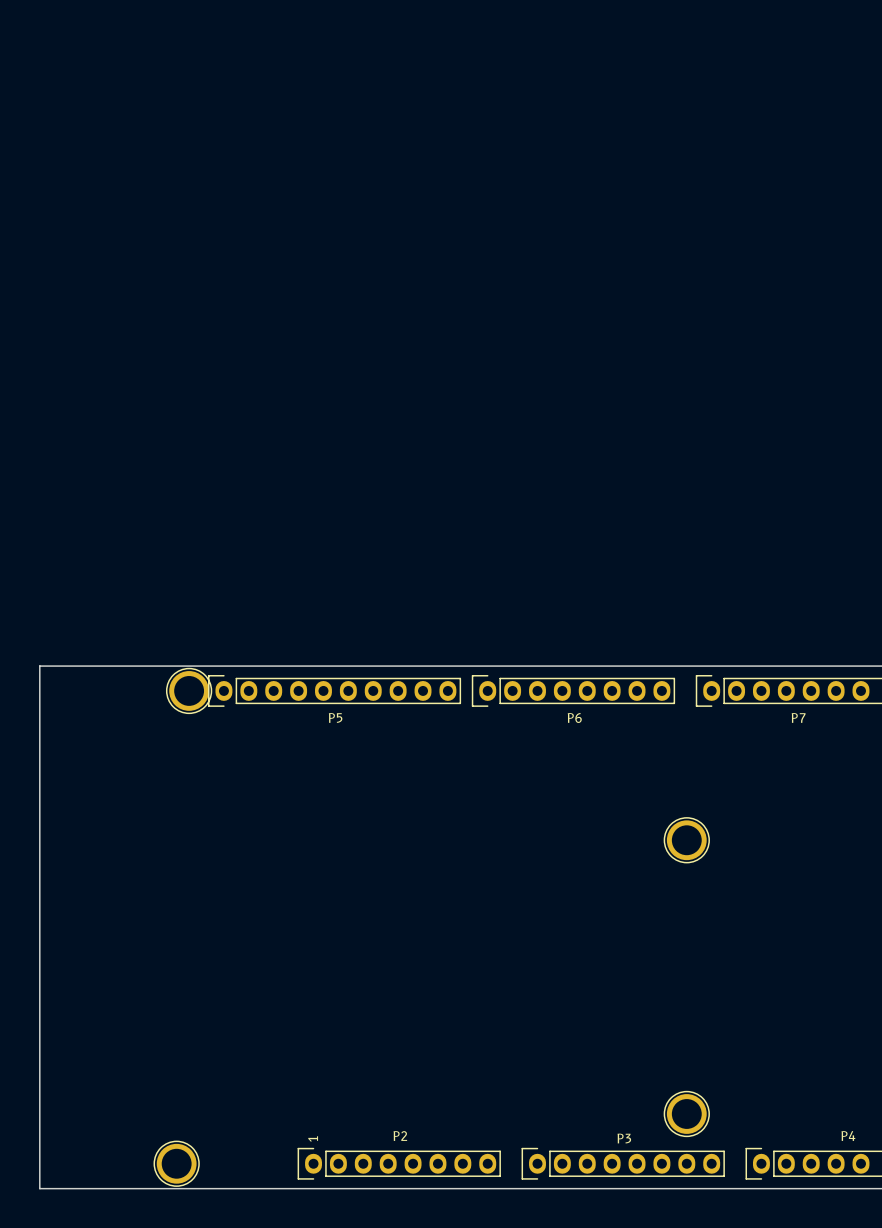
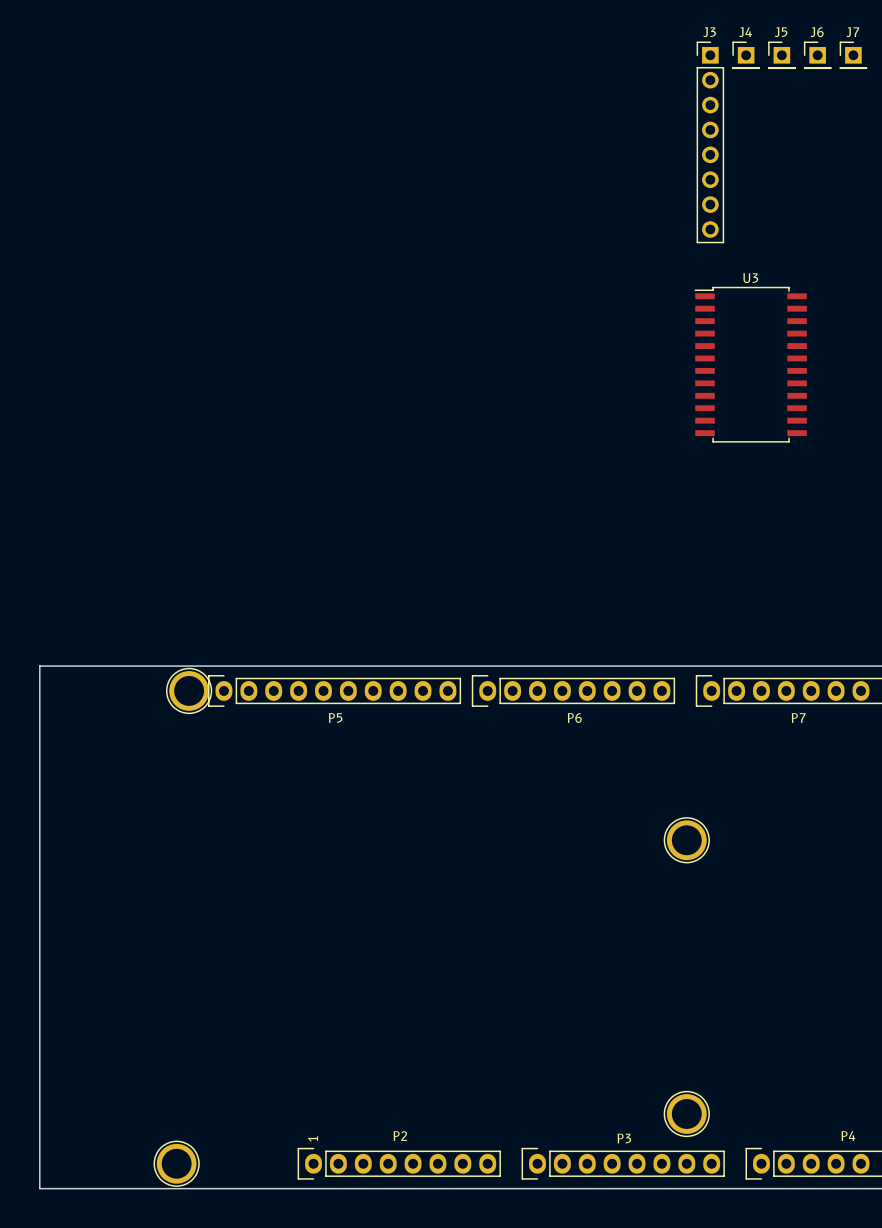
J4: none -> (746, 55)
J5: none -> (781, 55)
J6: none -> (817, 55)
J7: none -> (853, 55)
J3: none -> (710, 142)
U3: none -> (750, 364)

